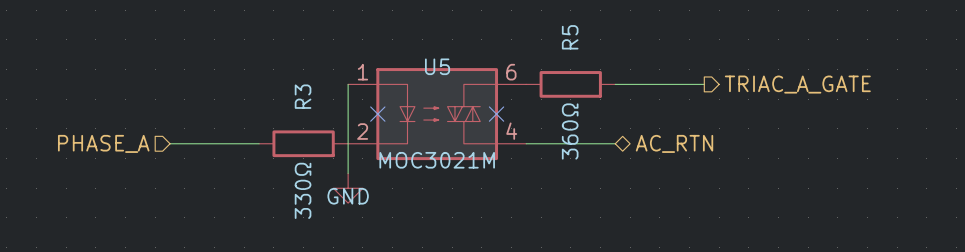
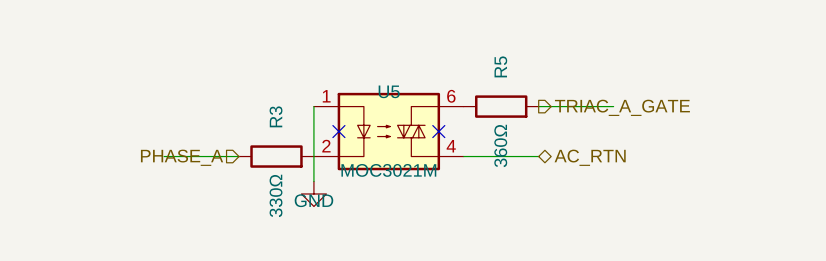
hierarchical label position: TRIAC_A_GATE (797, 84) -> TRIAC_A_GATE (622, 107)
hierarchical label position: PHASE_A (103, 143) -> PHASE_A (182, 157)

